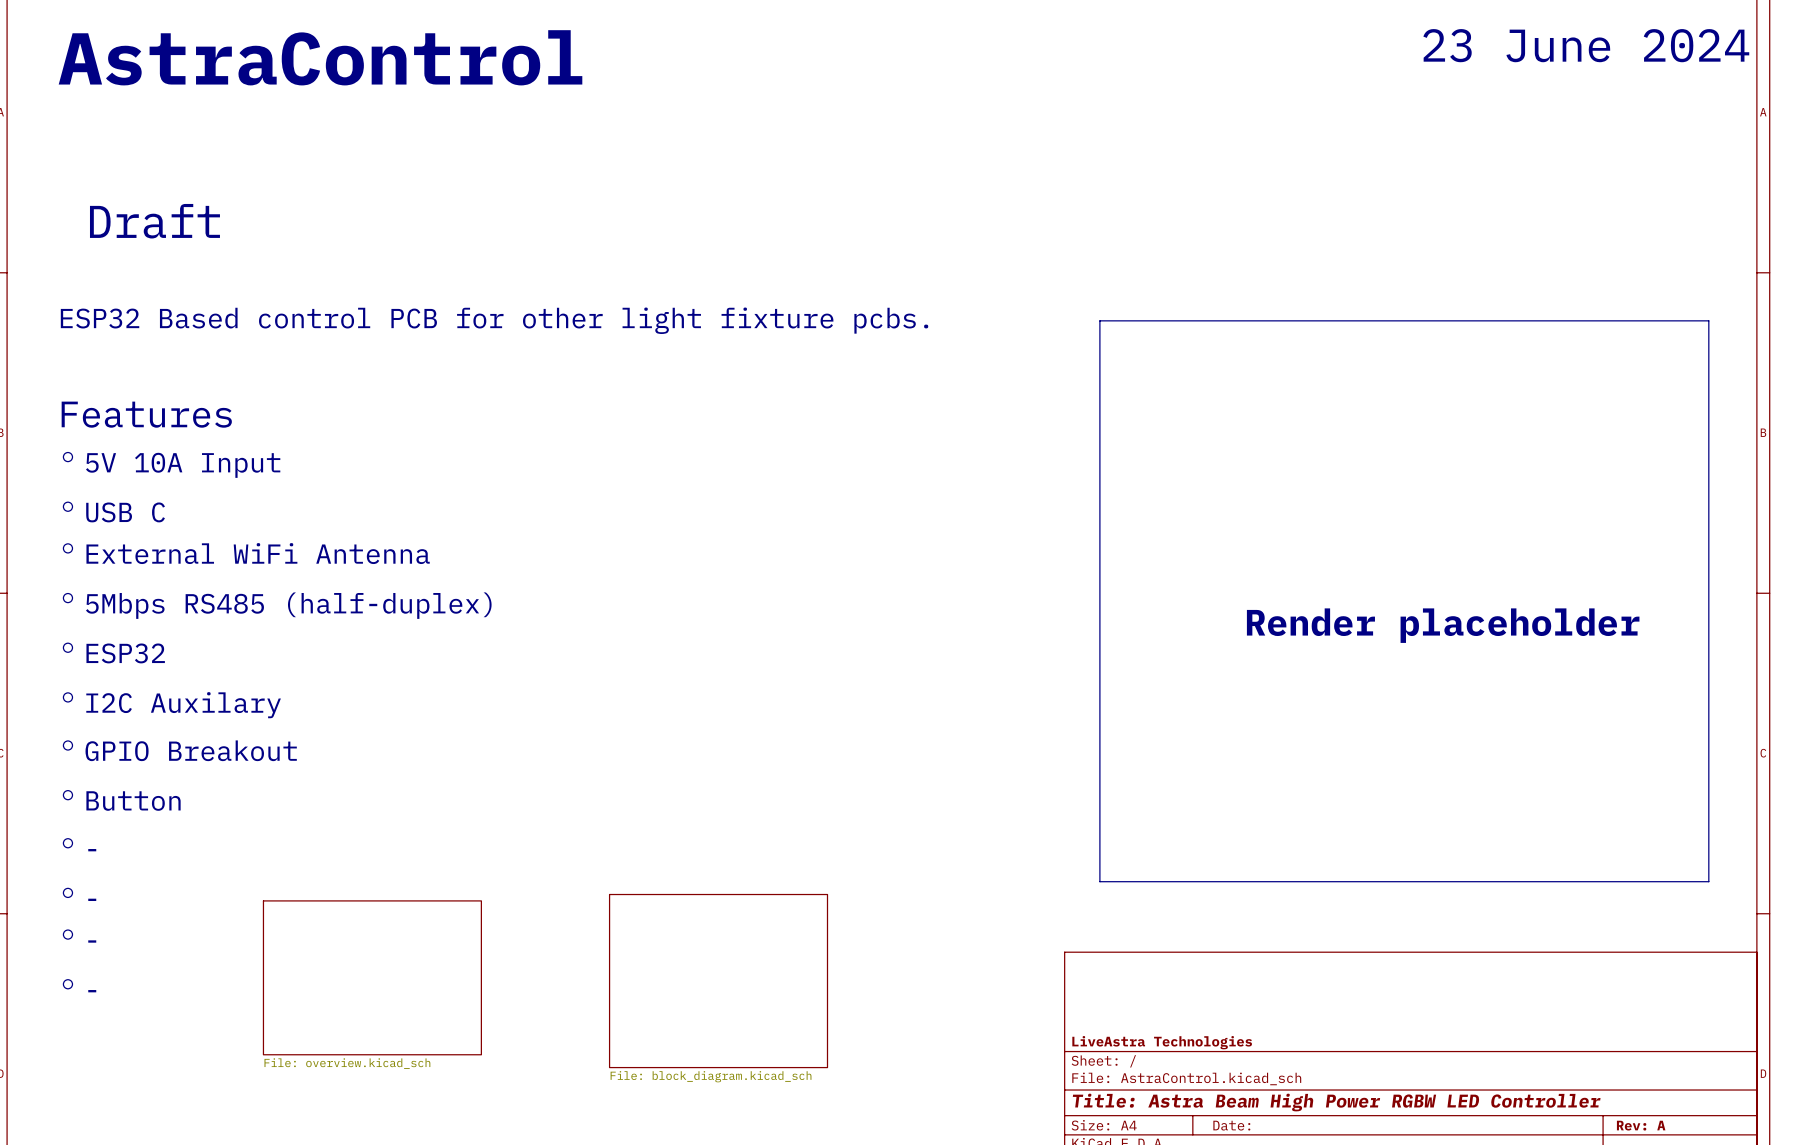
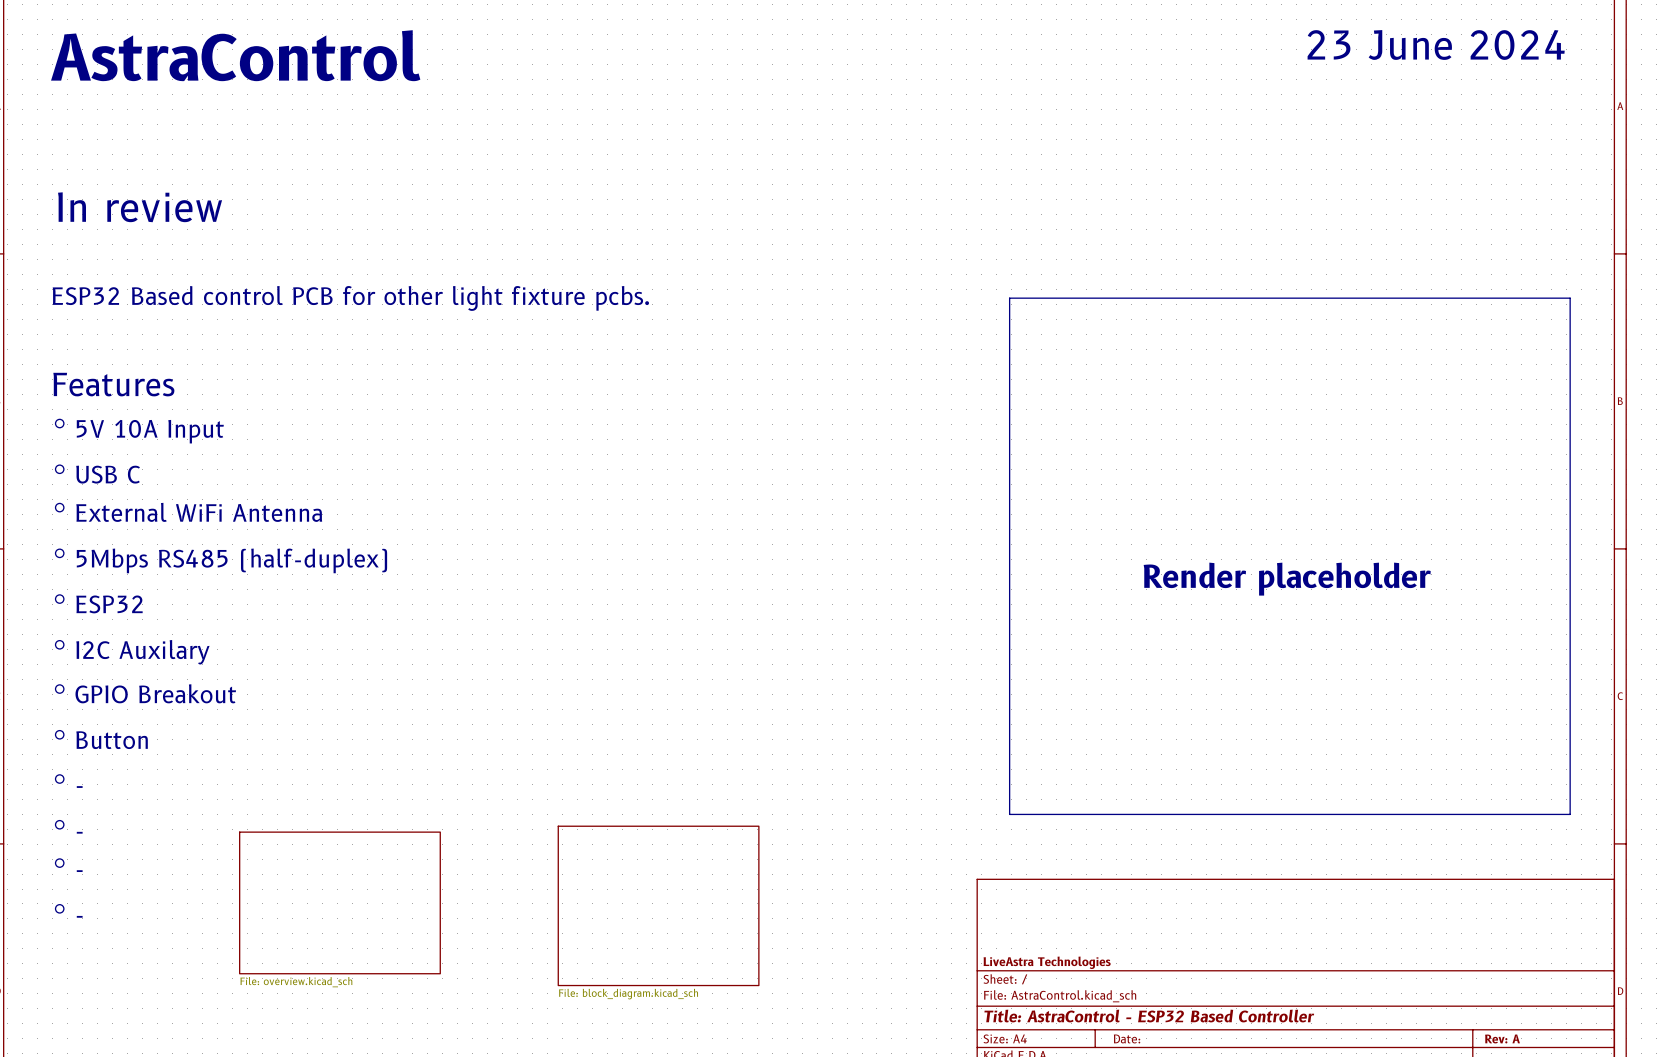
text: Draft (154, 221) -> In review (140, 207)
title block: Title: Astra Beam High Power RGBW LED Controller (1336, 1102) -> Title: AstraControl - ESP32 Based Controller (1149, 1016)

